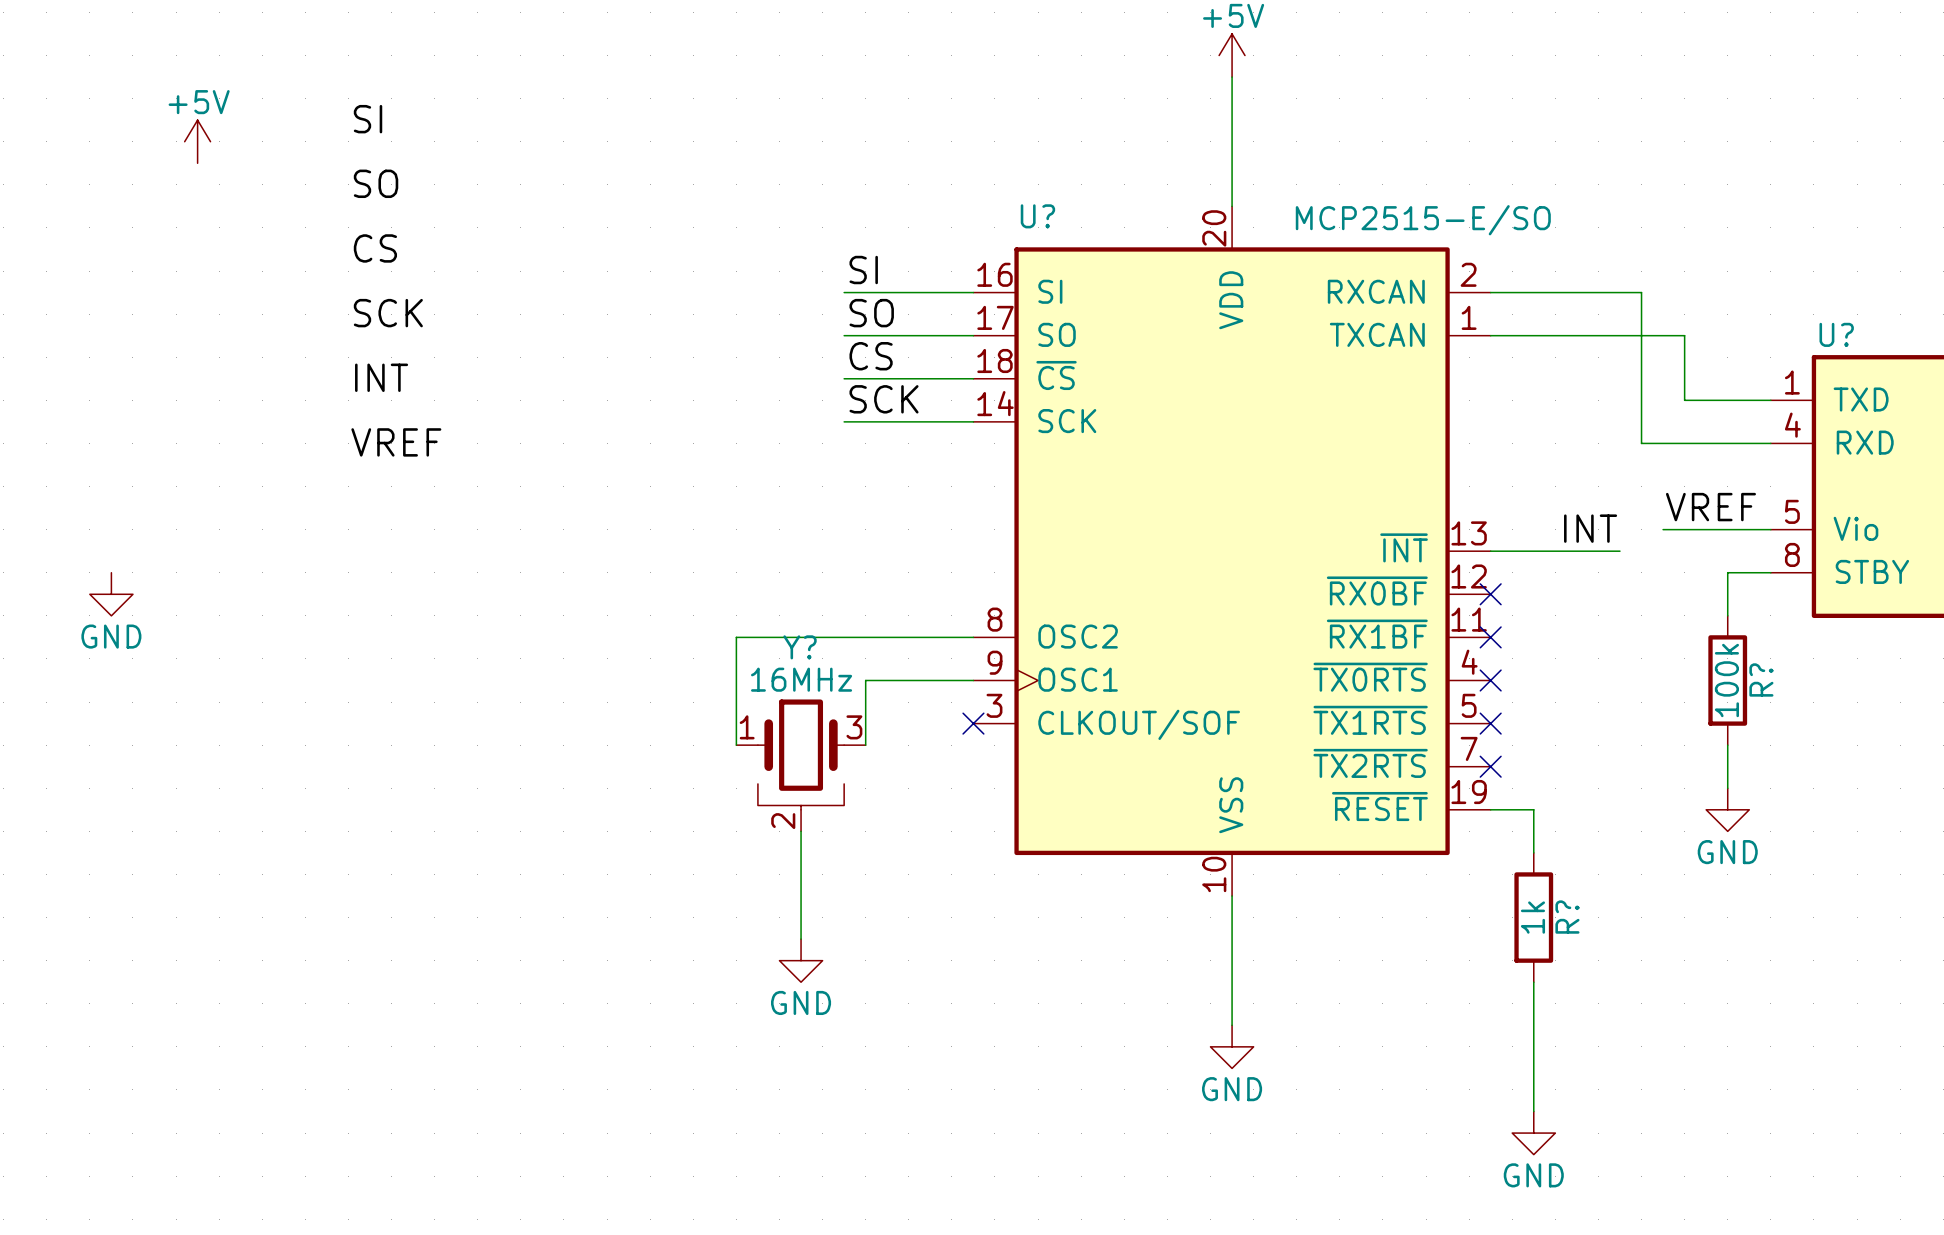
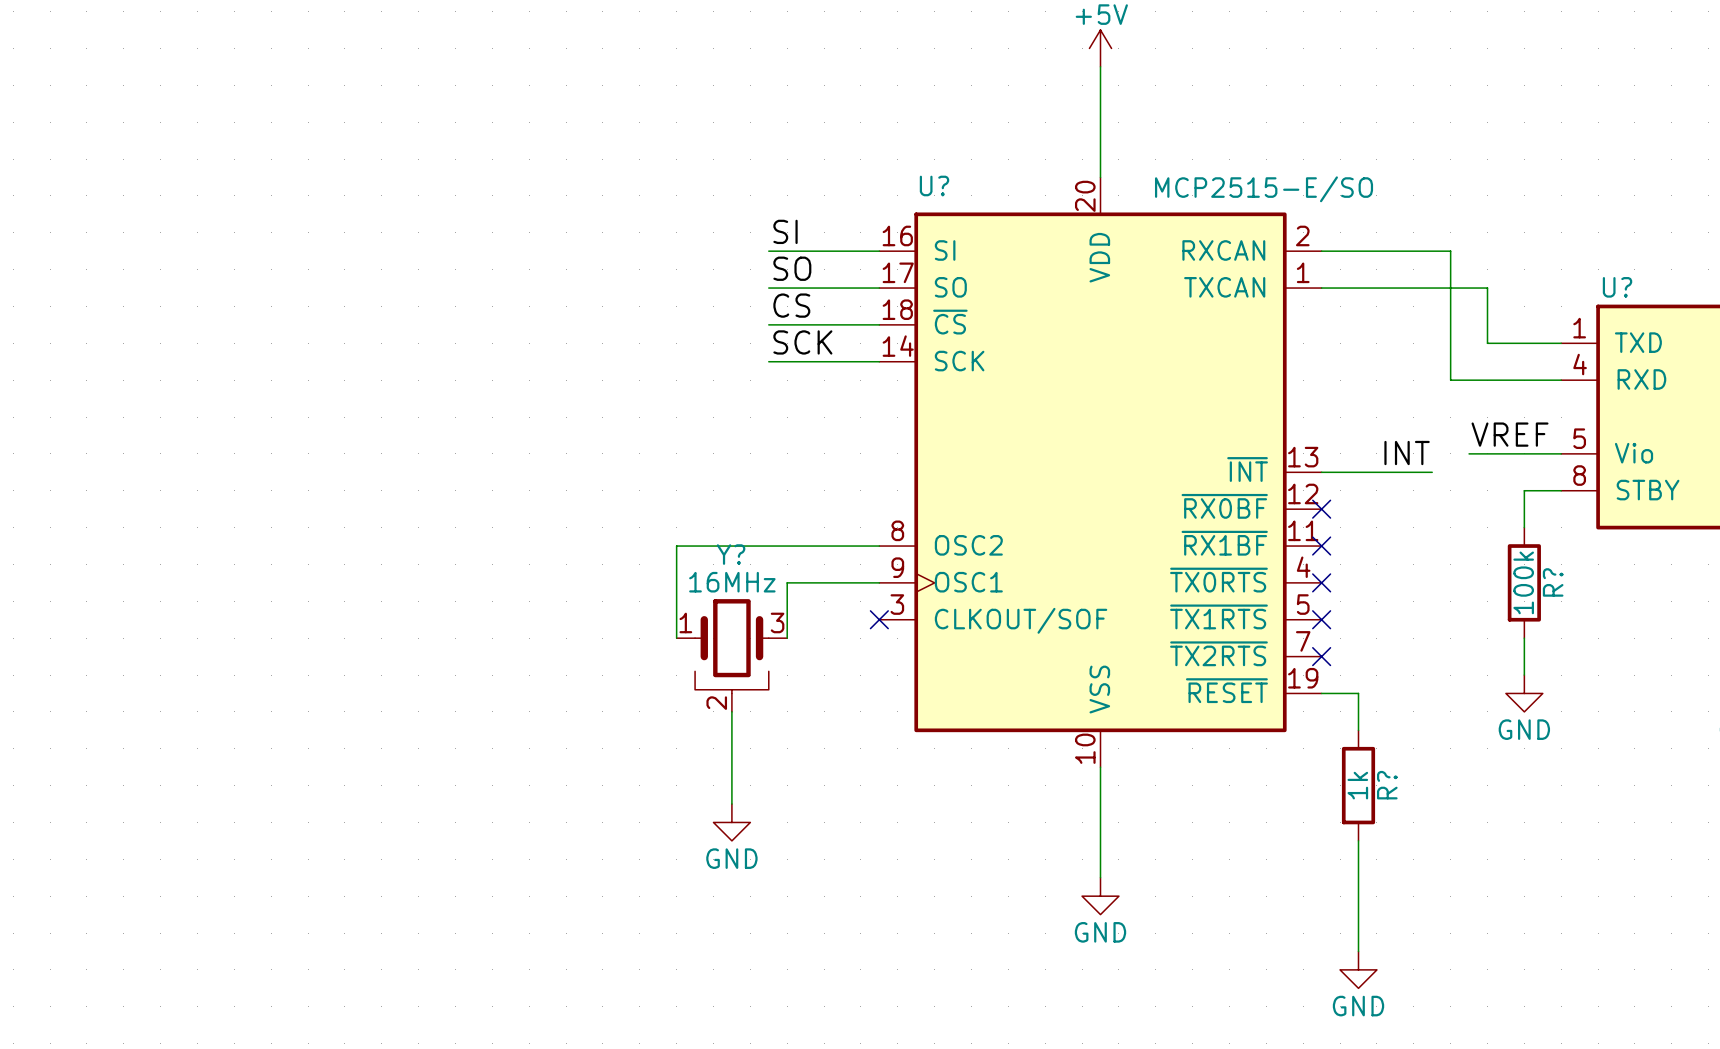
label: SI (368, 119) -> none
power symbol: +5V (197, 141) -> none
label: SO (376, 183) -> none
label: CS (375, 248) -> none
label: SCK (388, 313) -> none
label: INT (381, 377) -> none
label: VREF (396, 442) -> none
power symbol: GND (111, 594) -> none

